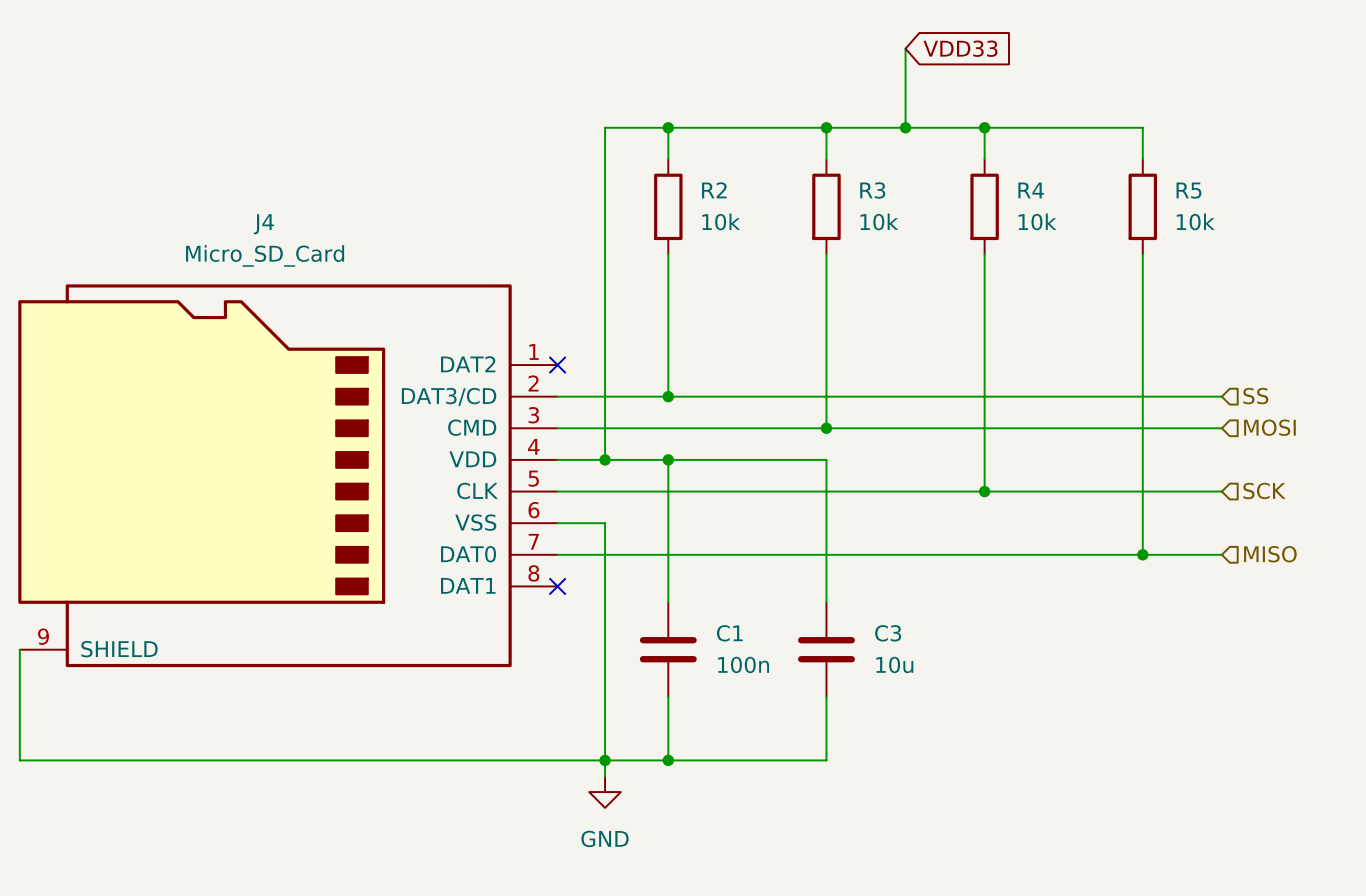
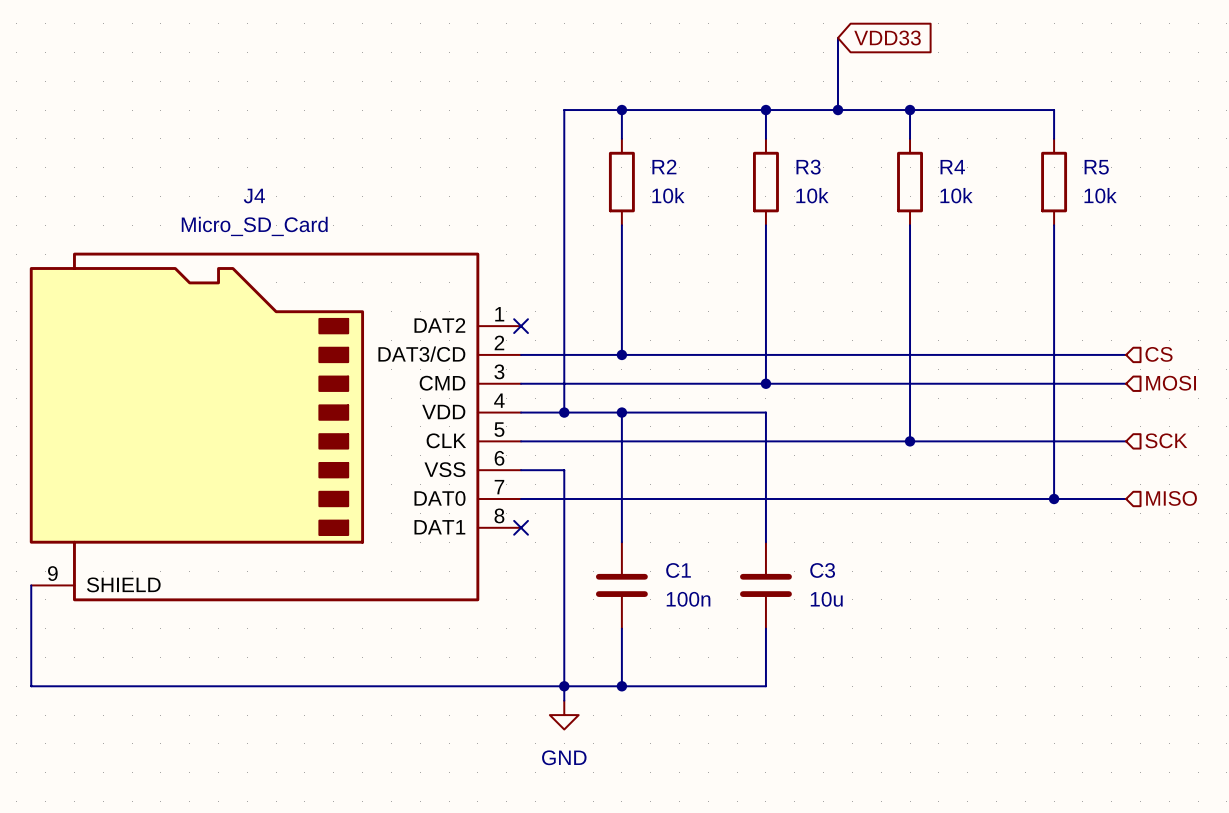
hierarchical label: SS (1255, 396) -> CS (1159, 354)

